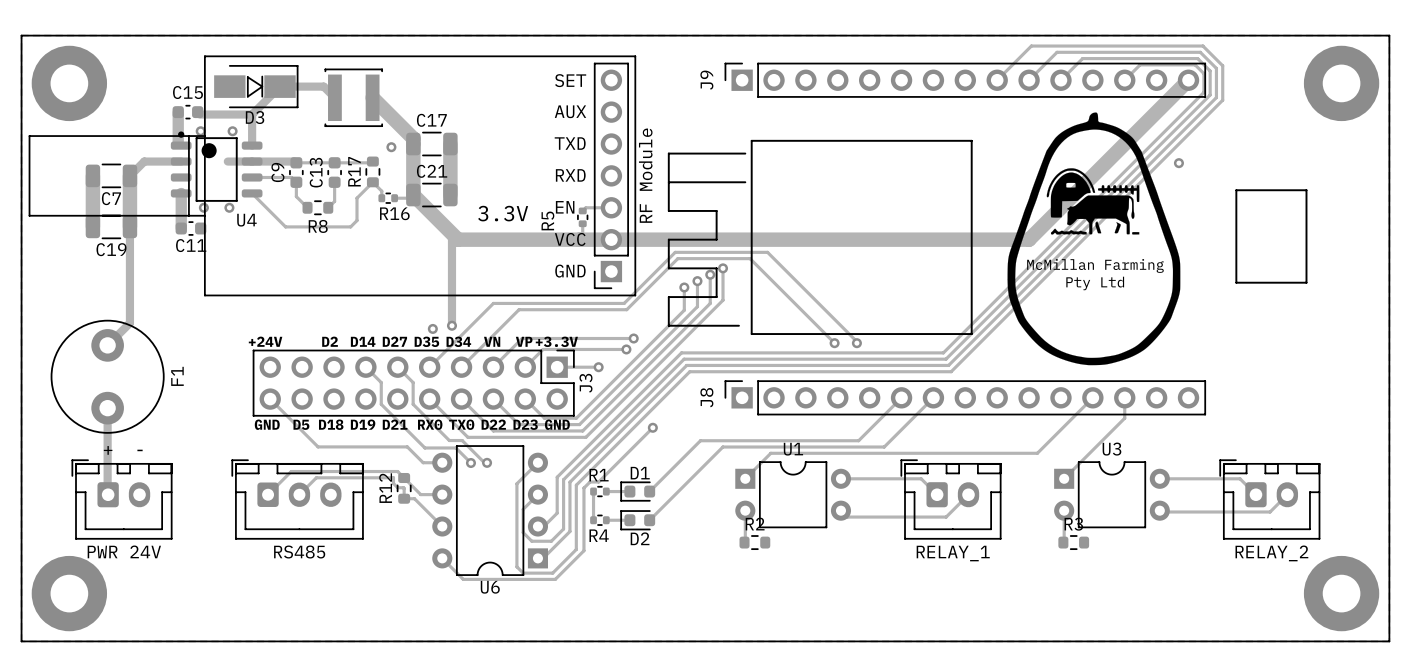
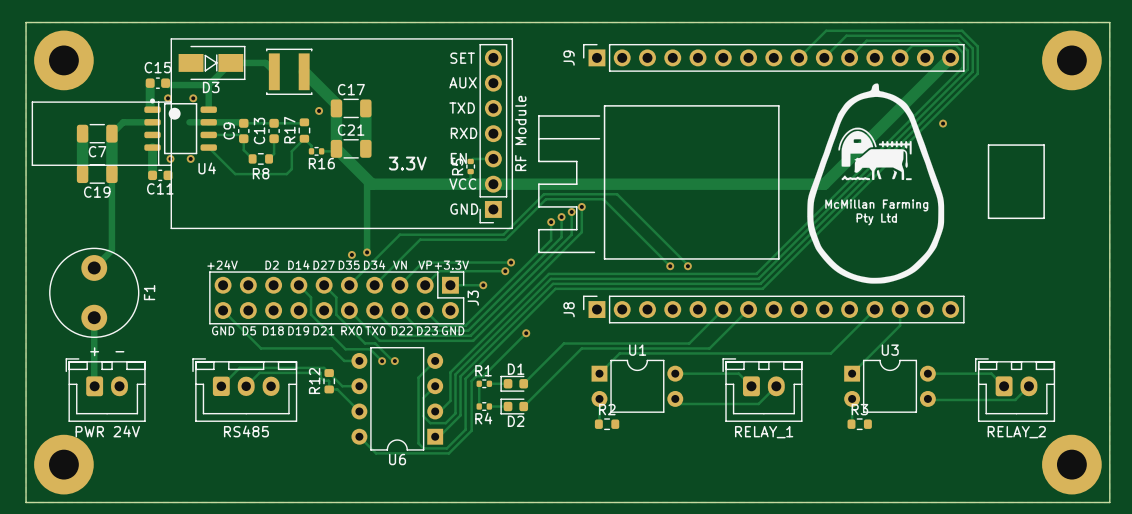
R5 name position: R5 (547, 220) -> R5 (457, 167)

